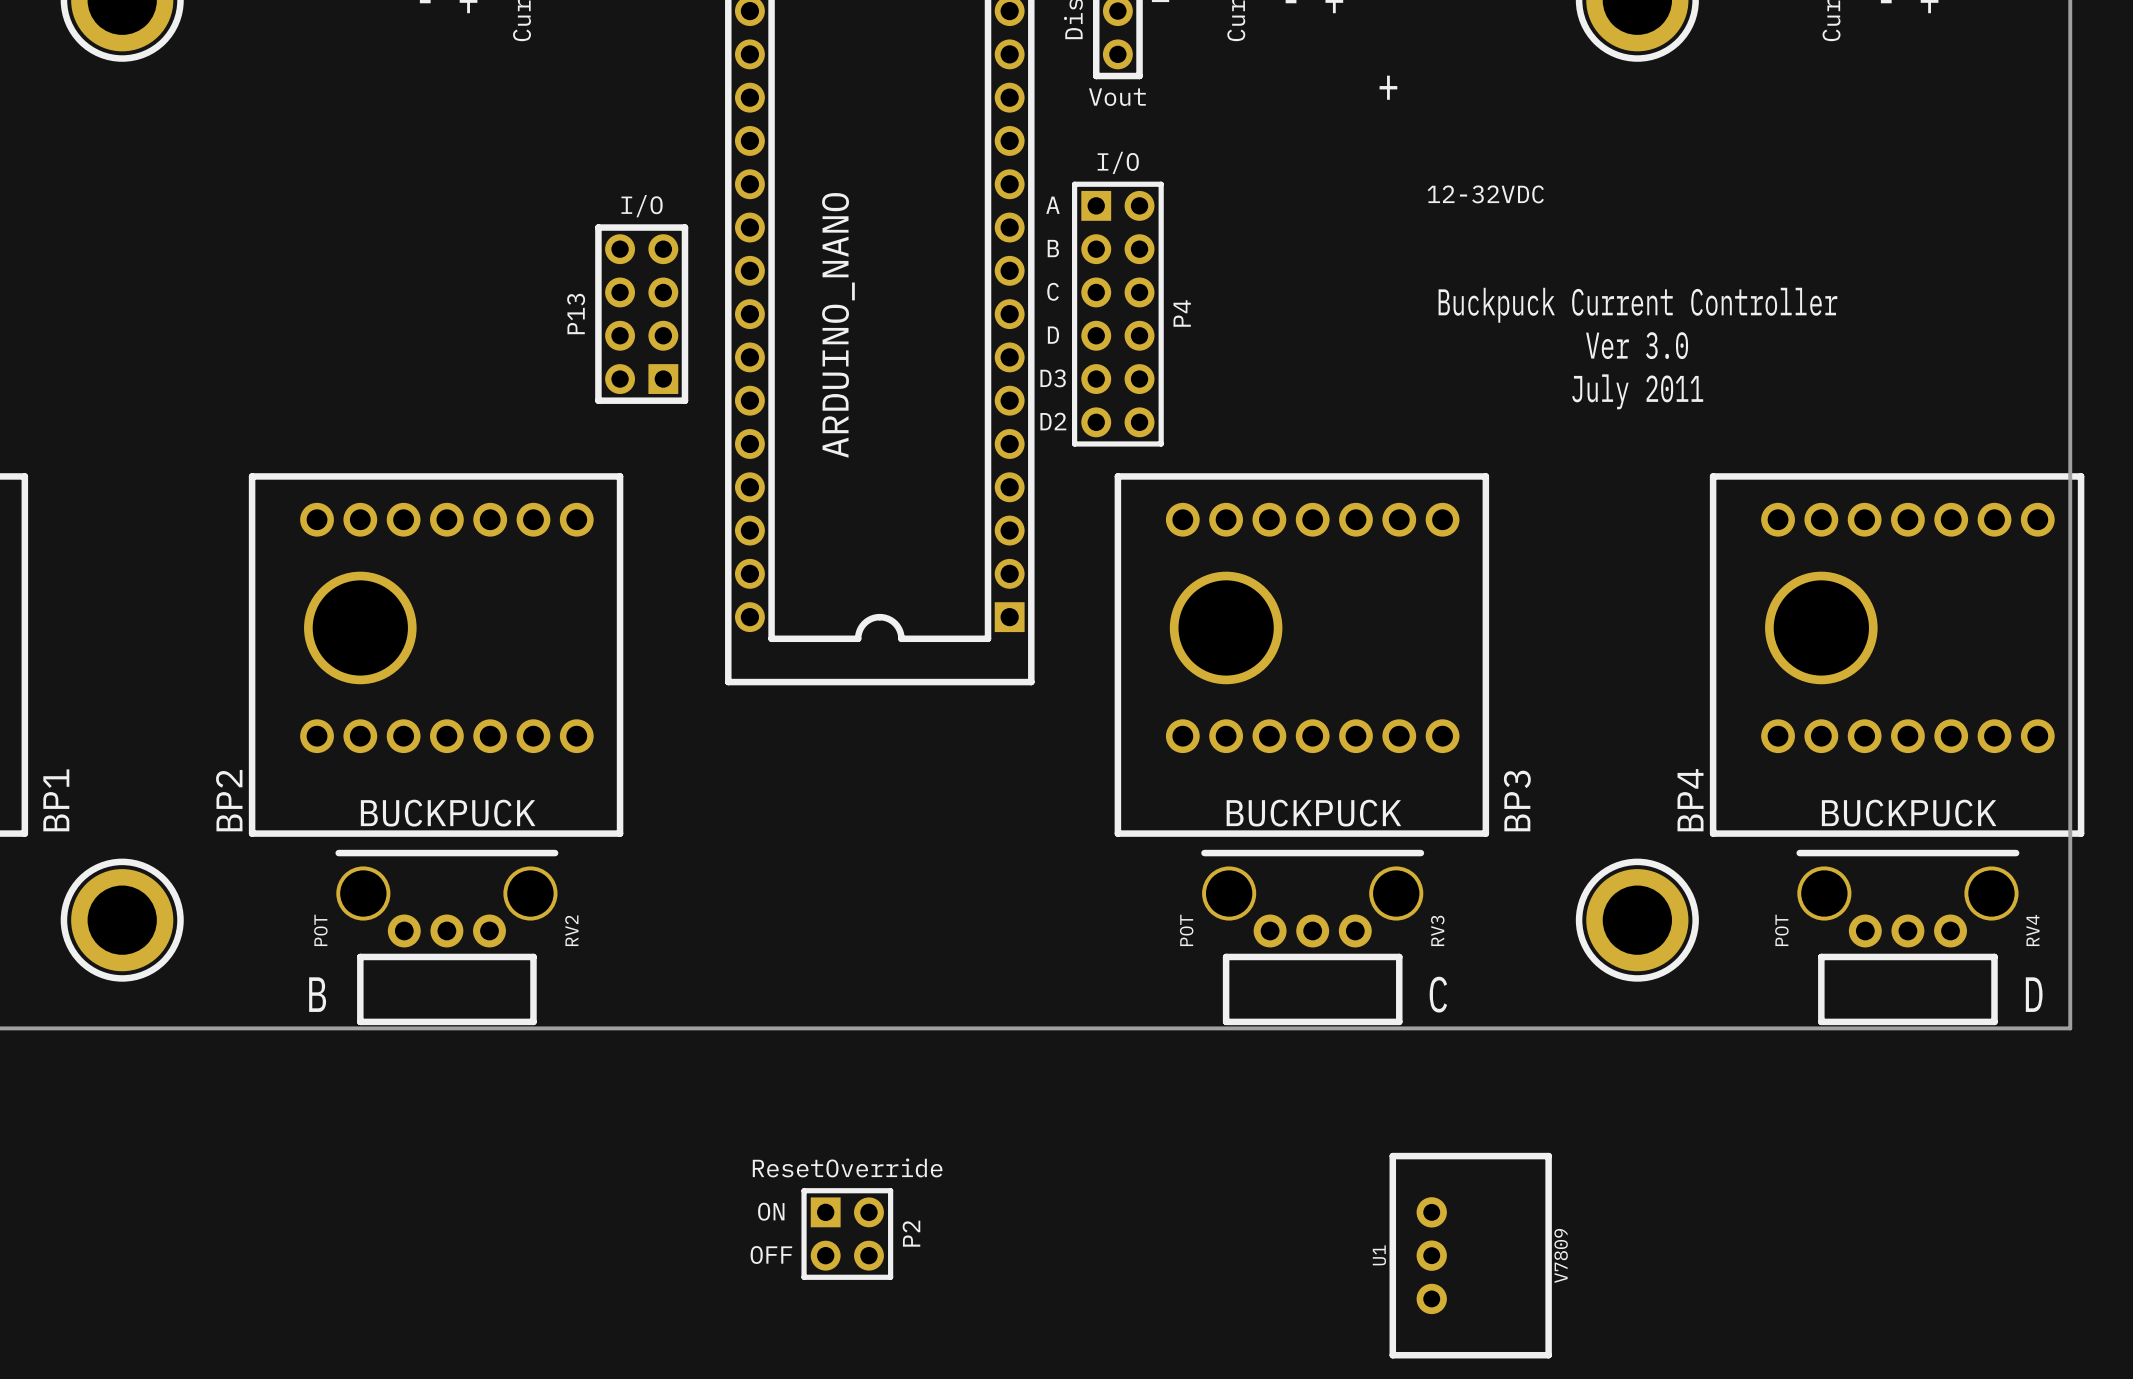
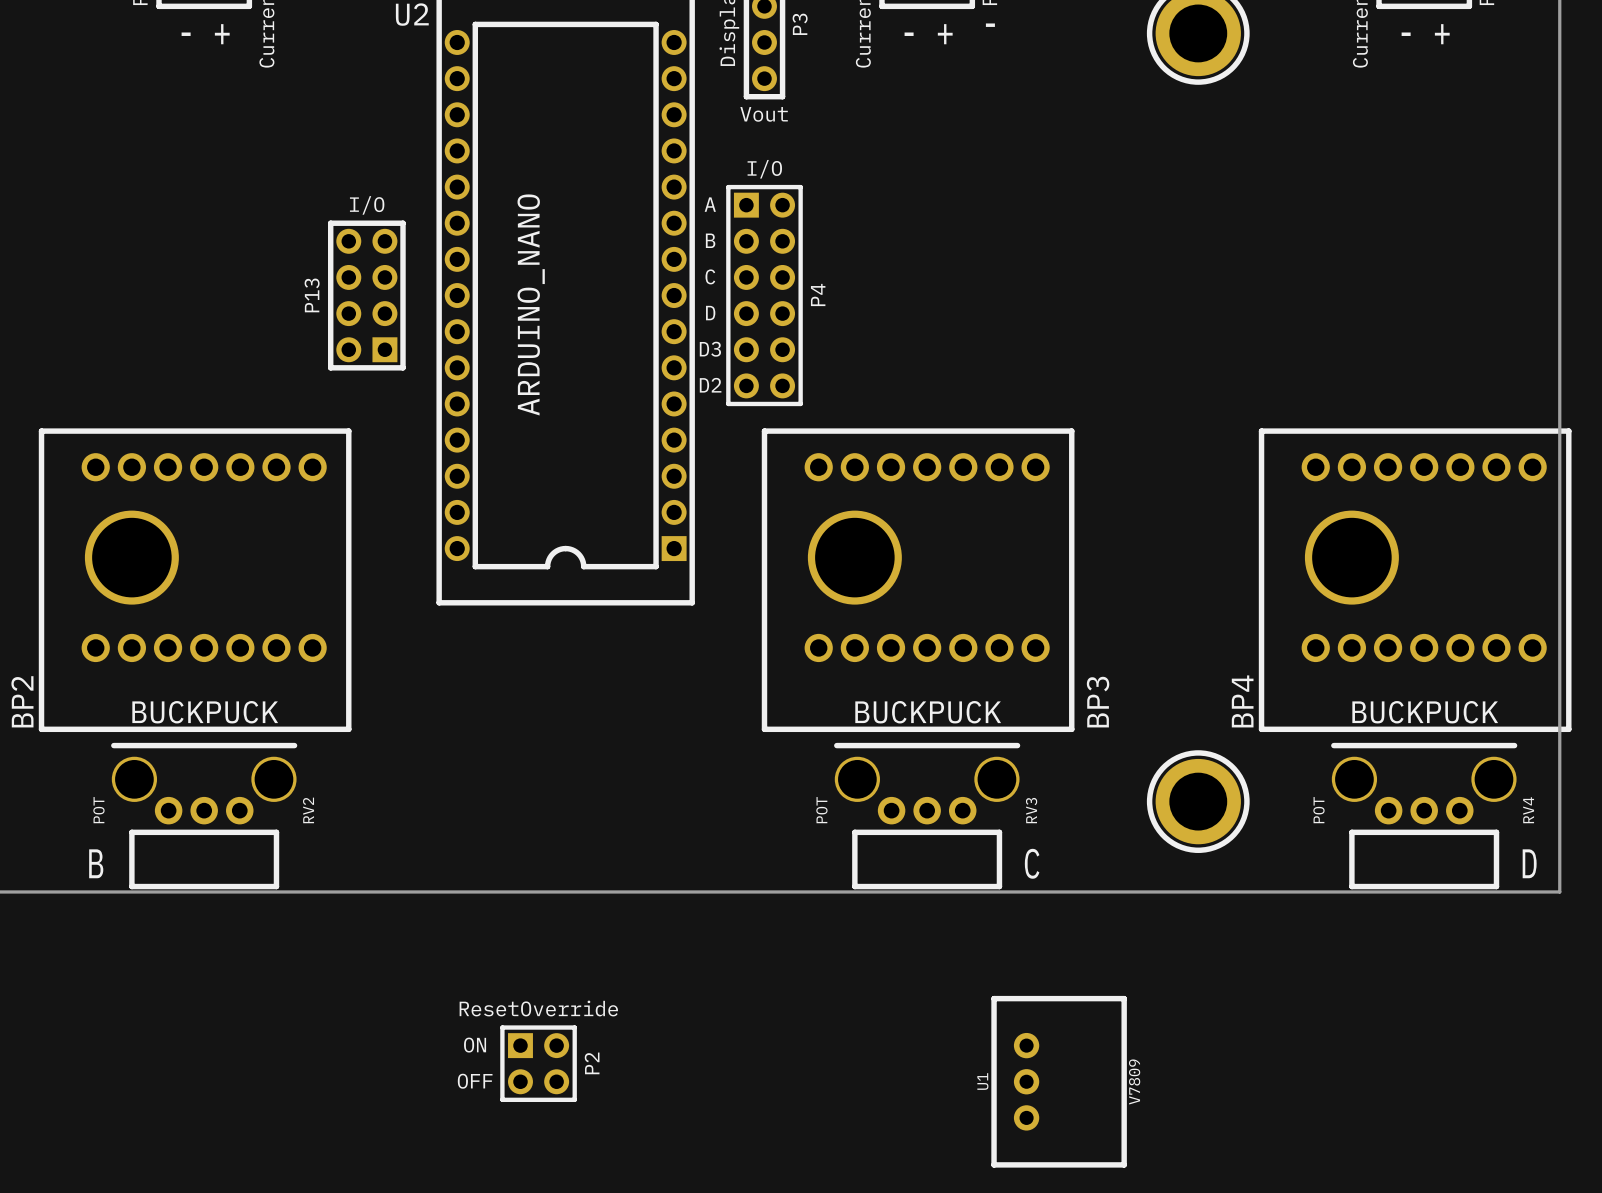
text: + (1388, 87) -> none
text: 12-32VDC (1485, 194) -> none
text: Buckpuck Current Controller (1637, 305) -> none
text: Ver 3.0 (1637, 345) -> none
text: July 2011 (1637, 391) -> none

